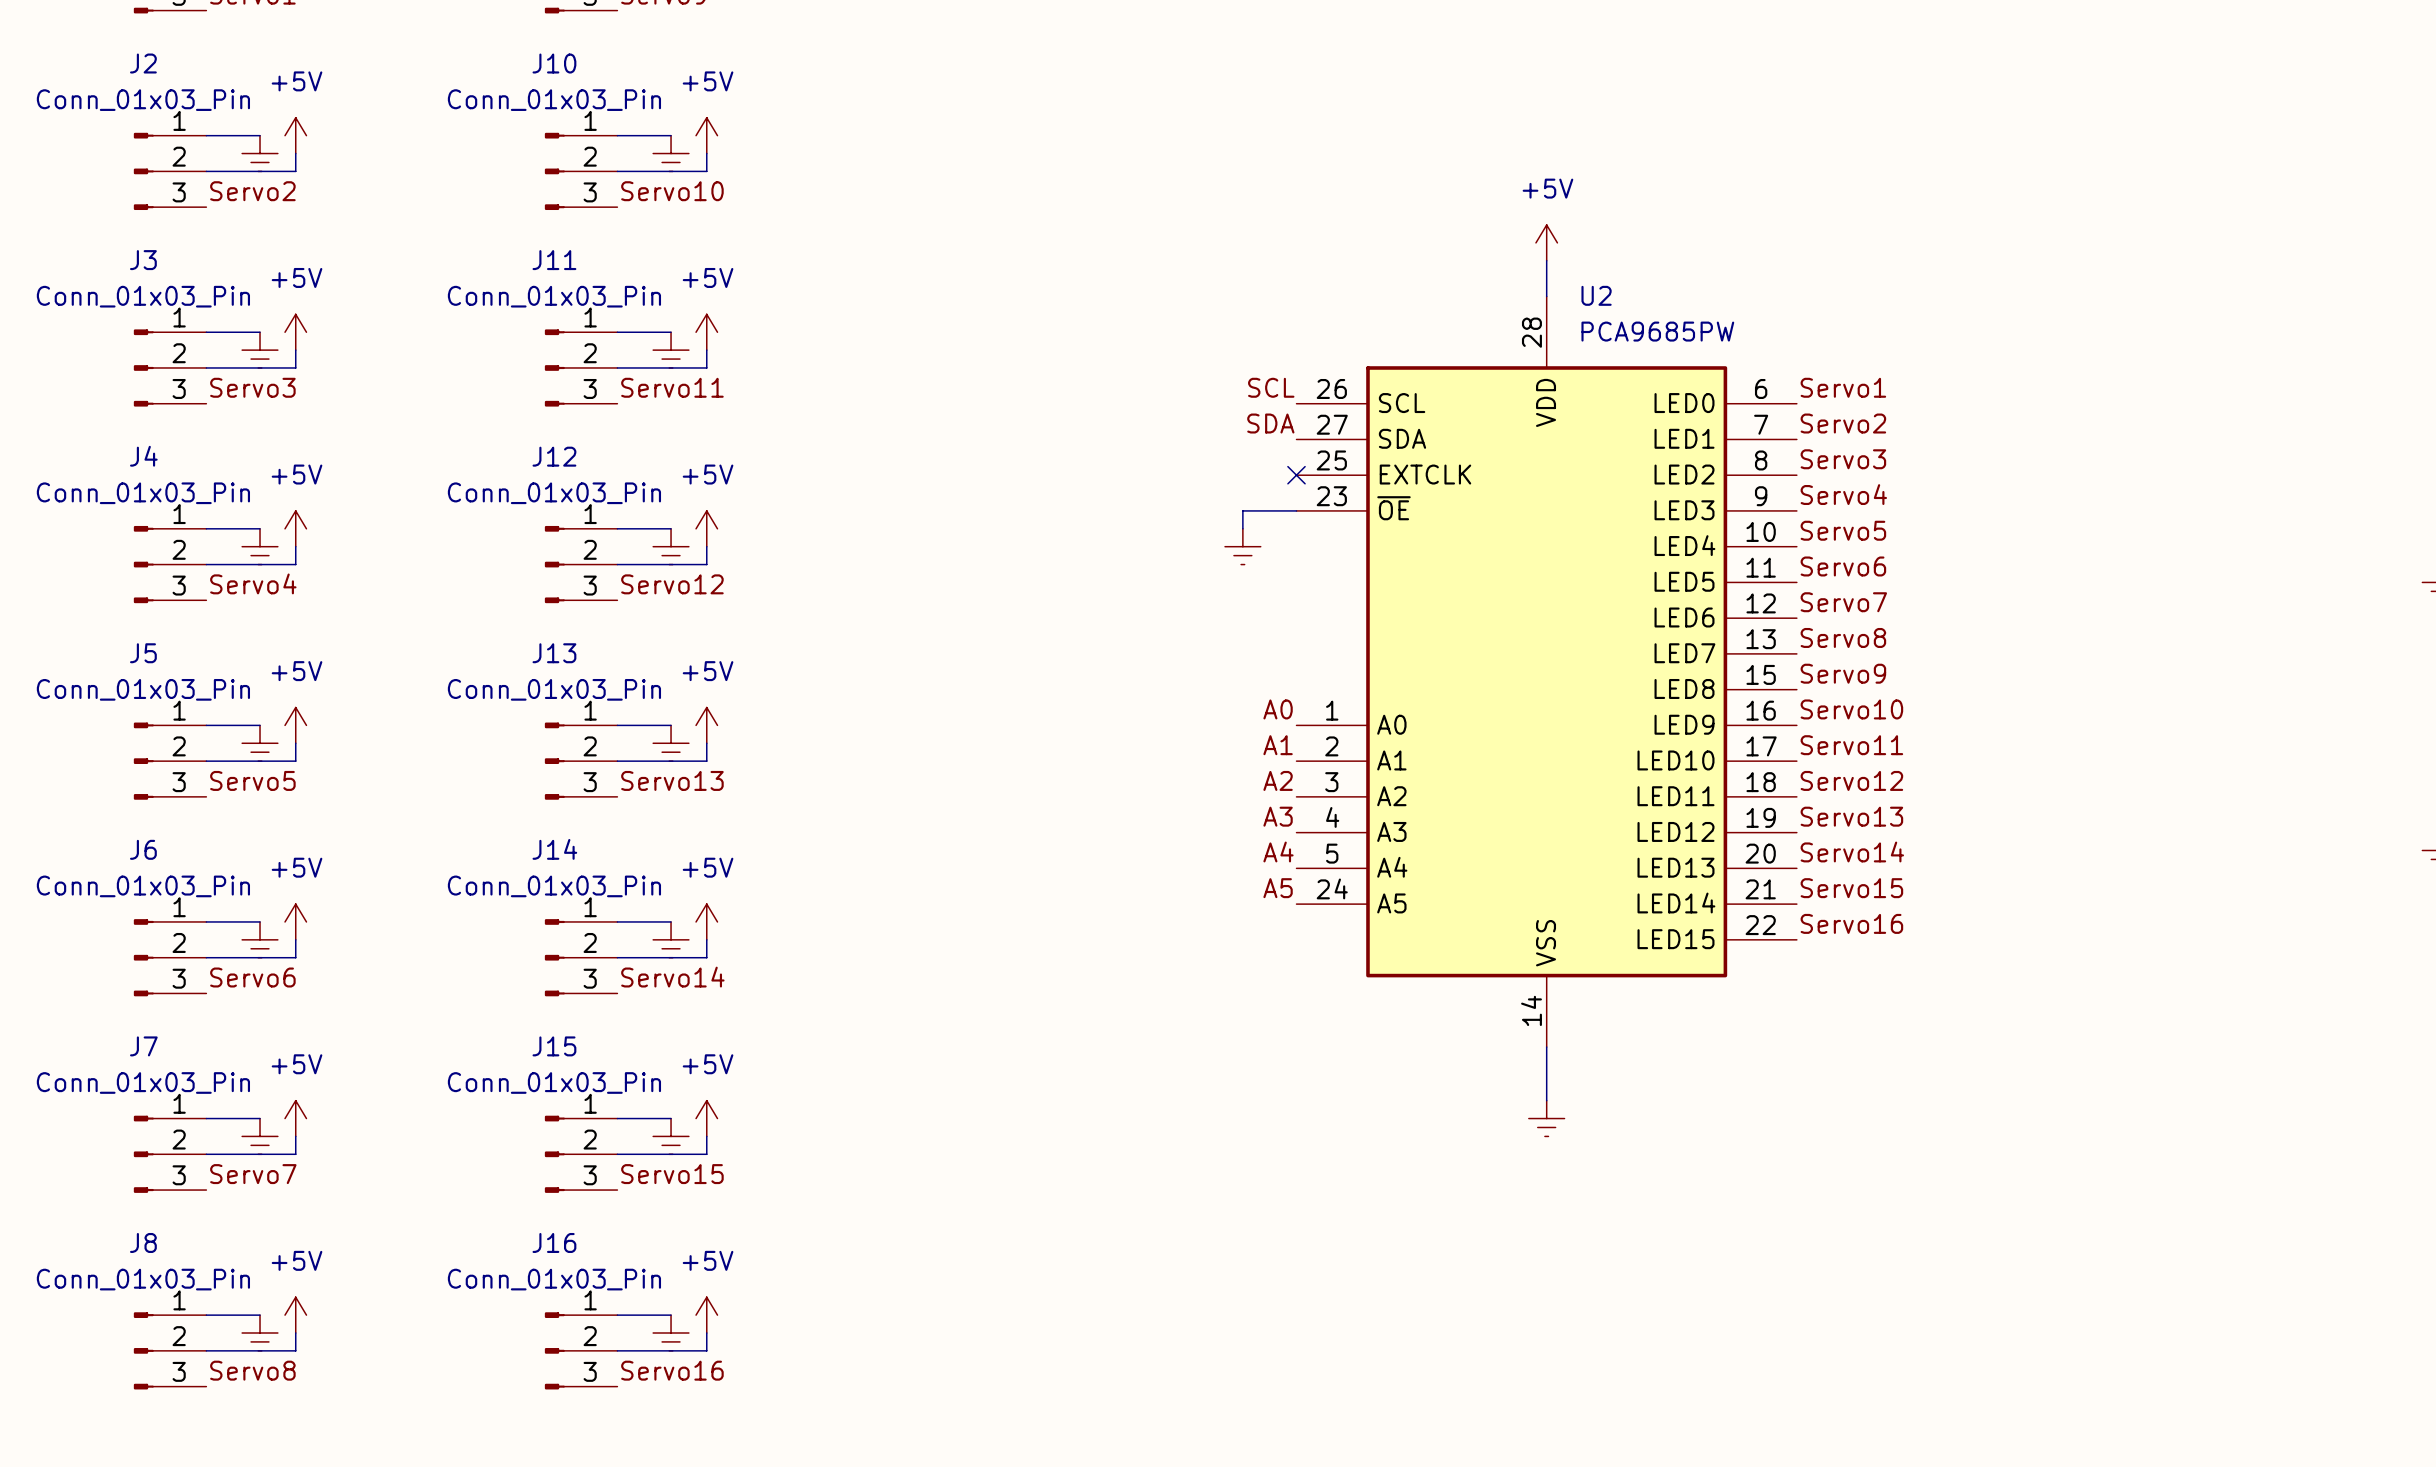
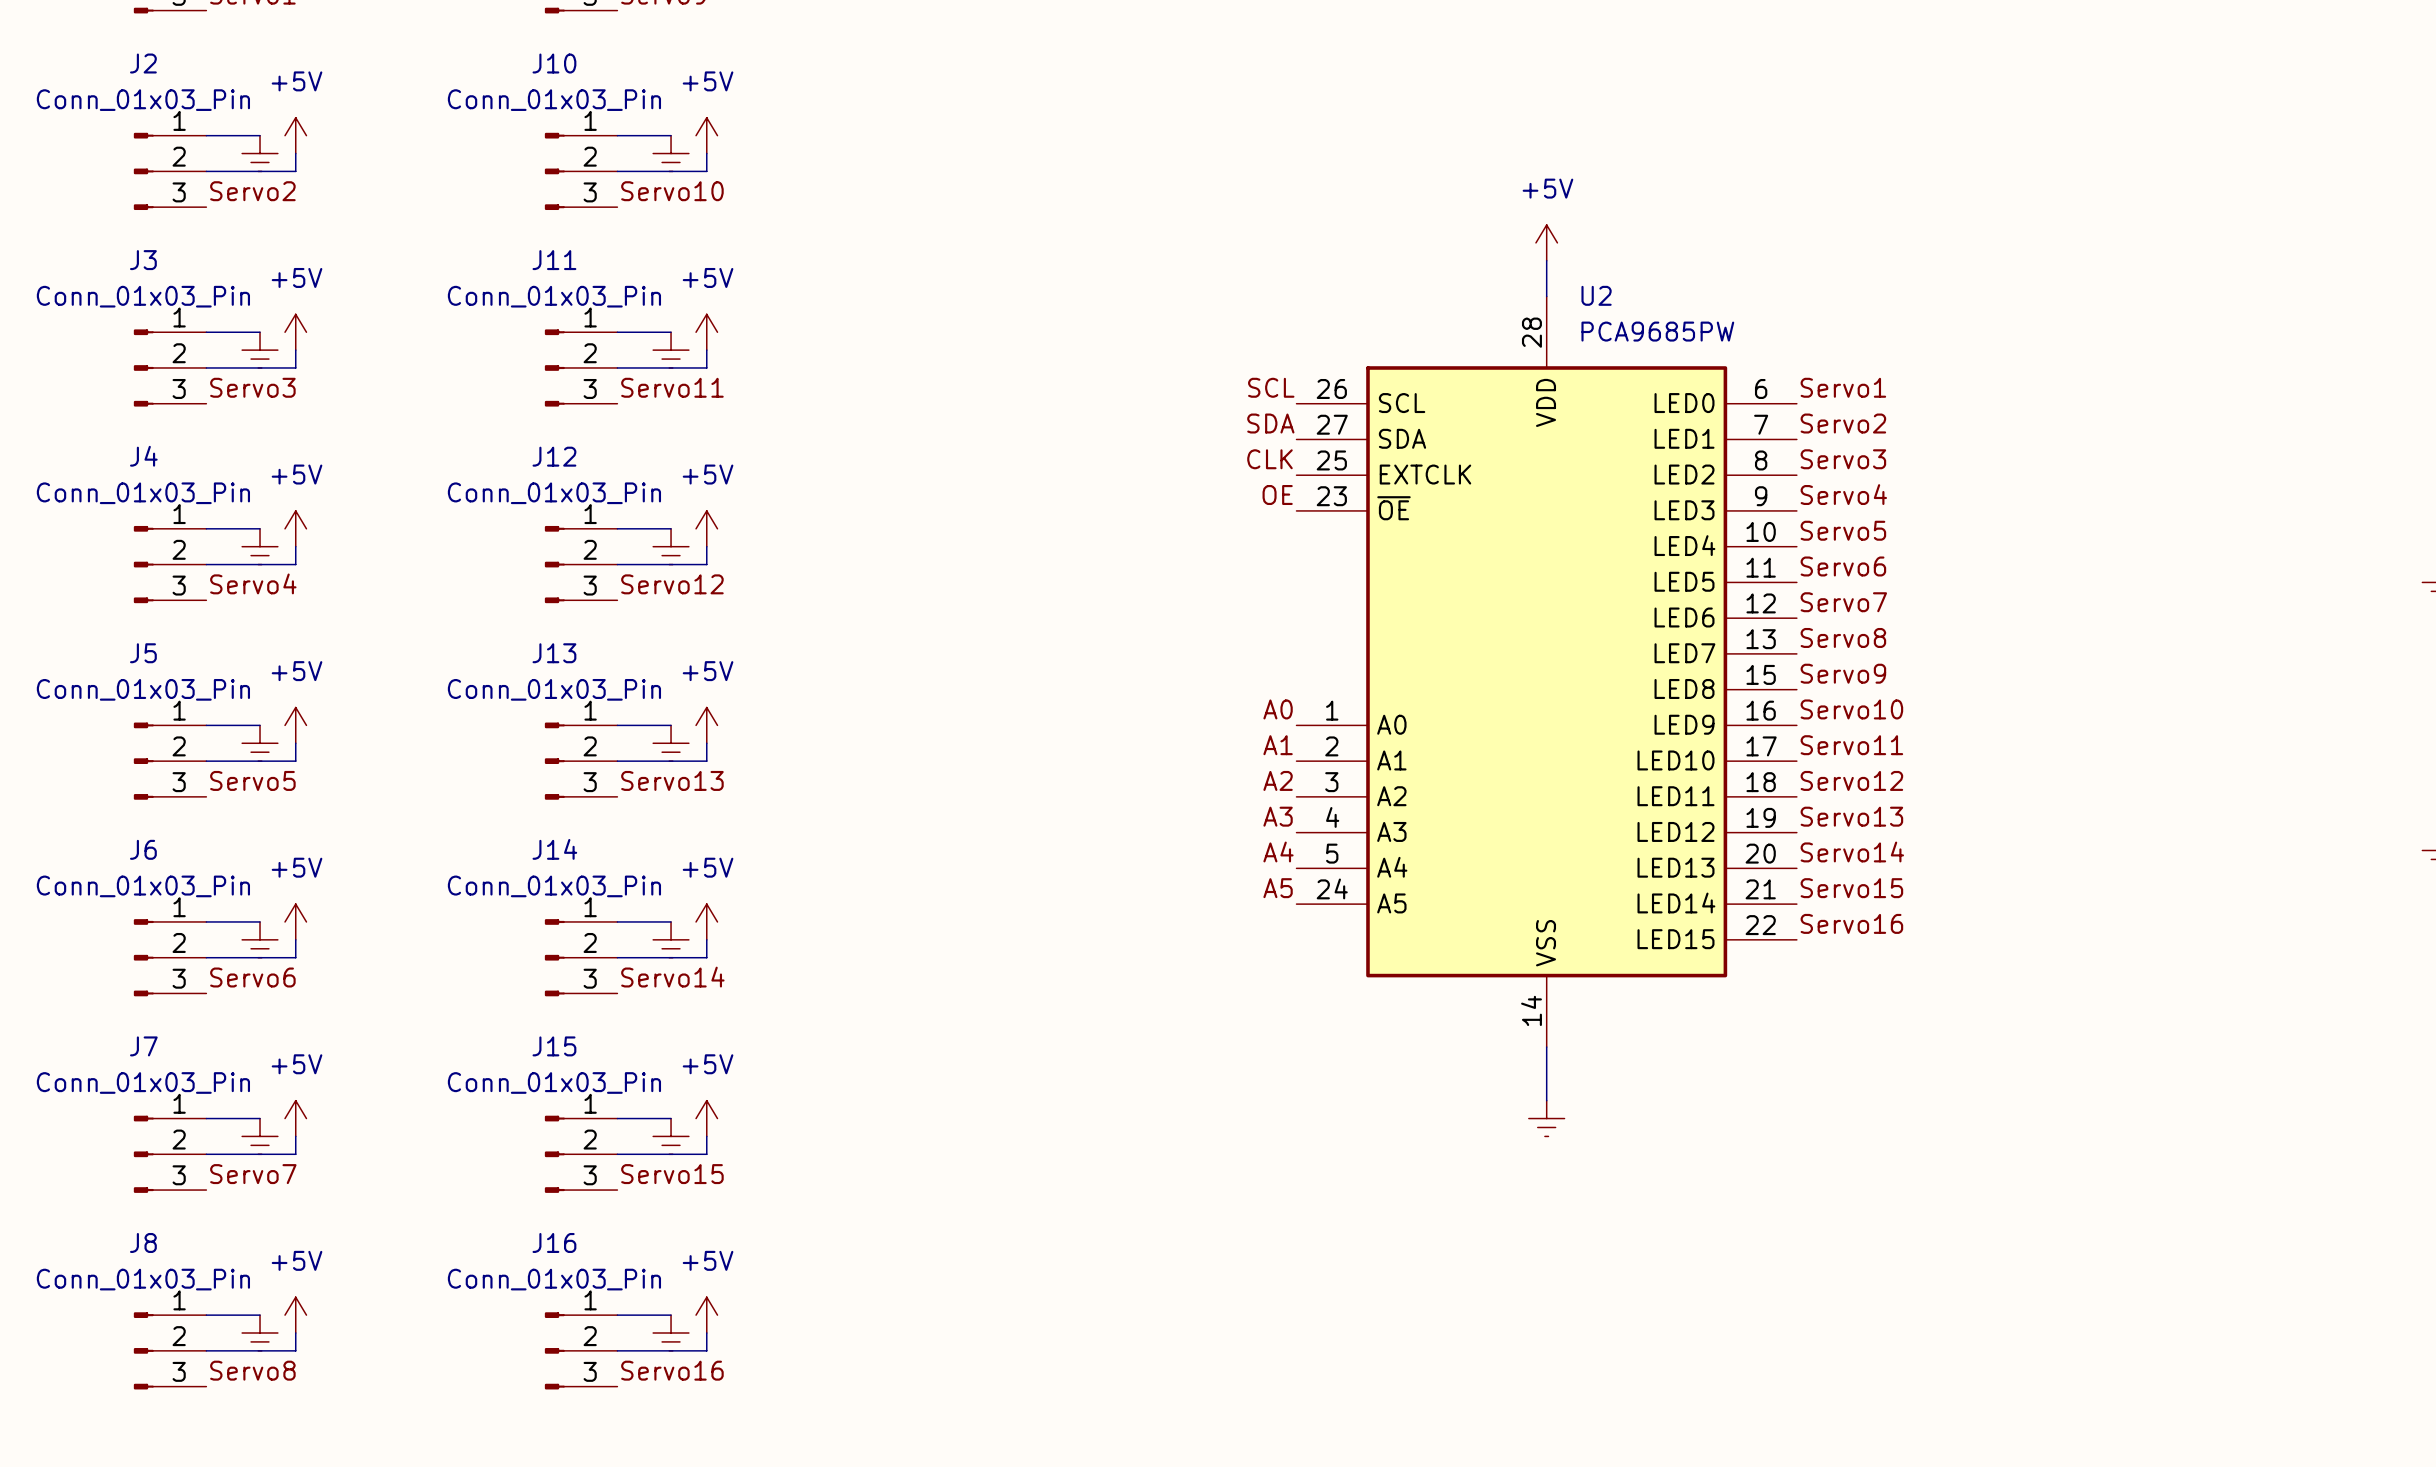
label: none -> CLK (1269, 459)
no-connect mark: (1296, 475) -> none
label: none -> OE (1277, 495)
wire: (1296, 510) (1242, 510) (1242, 528) -> none
power symbol: (1242, 546) -> none

